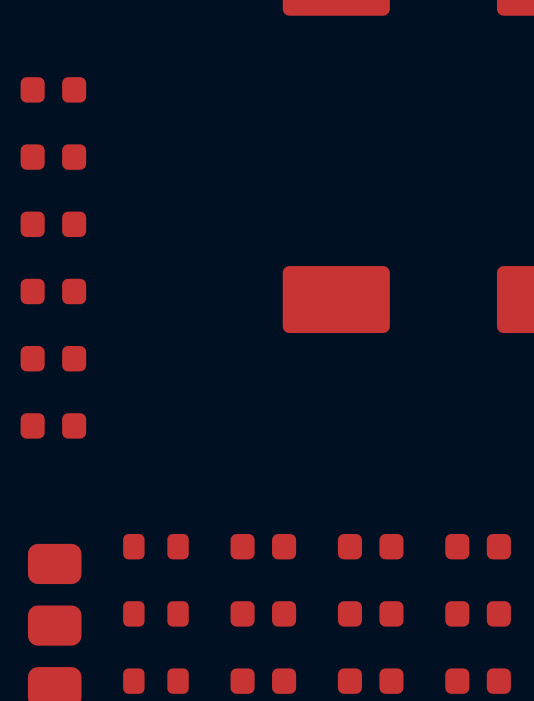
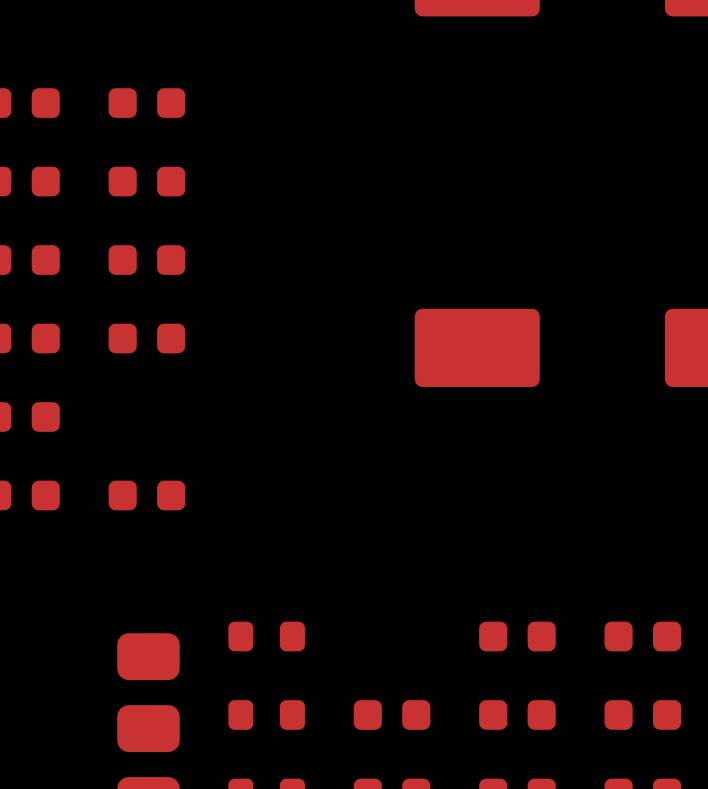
part: (53, 358) -> none
part: (263, 546) -> none

